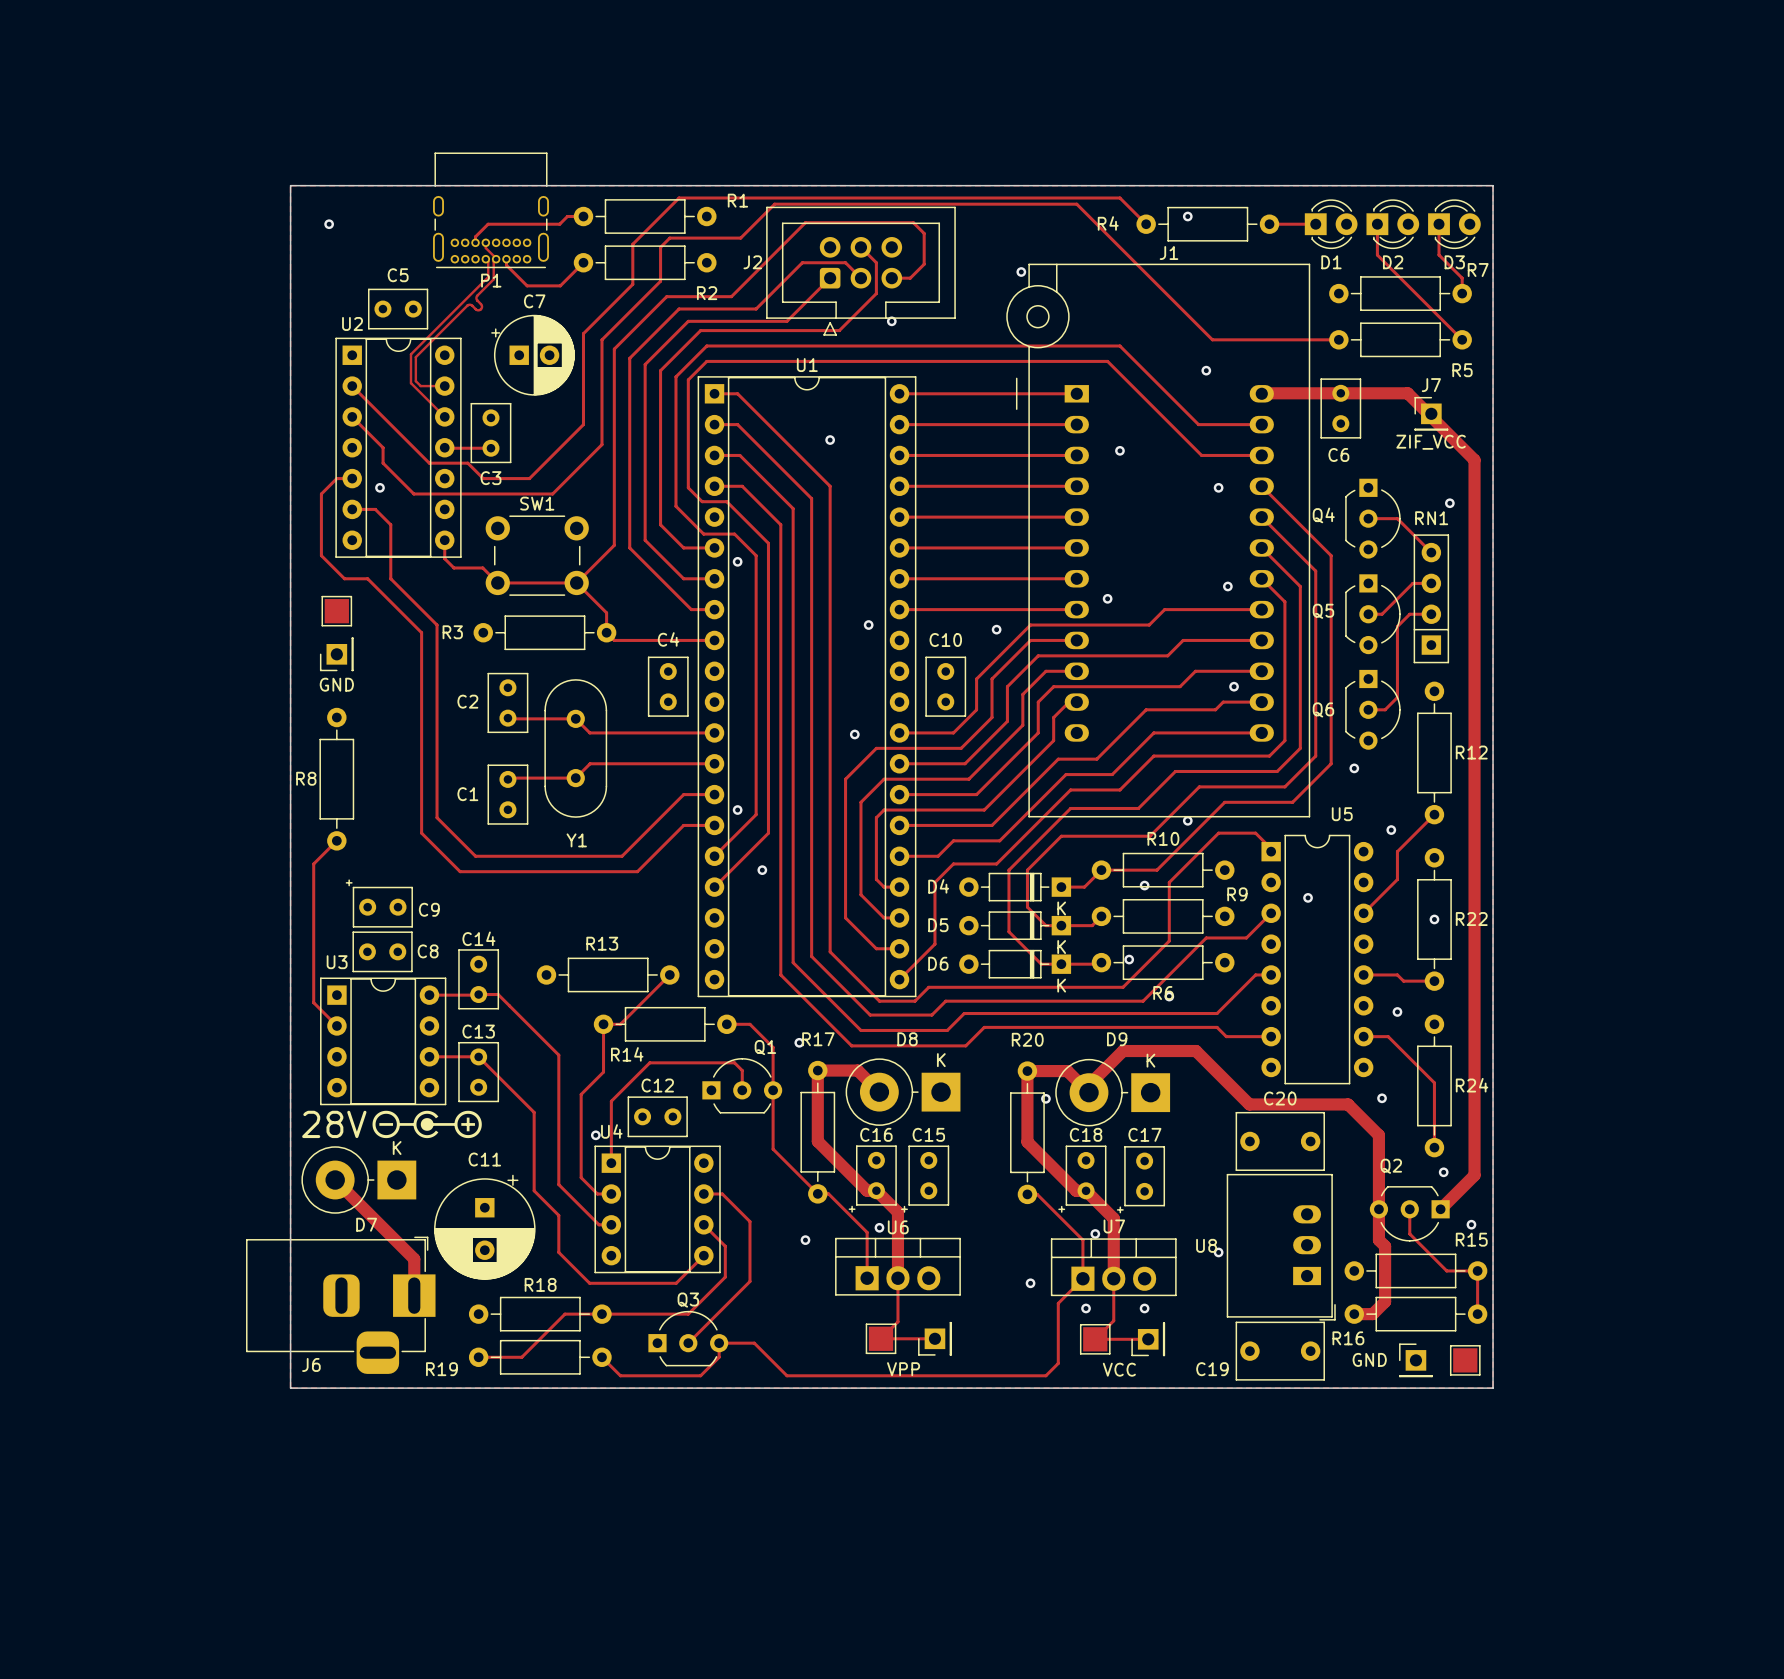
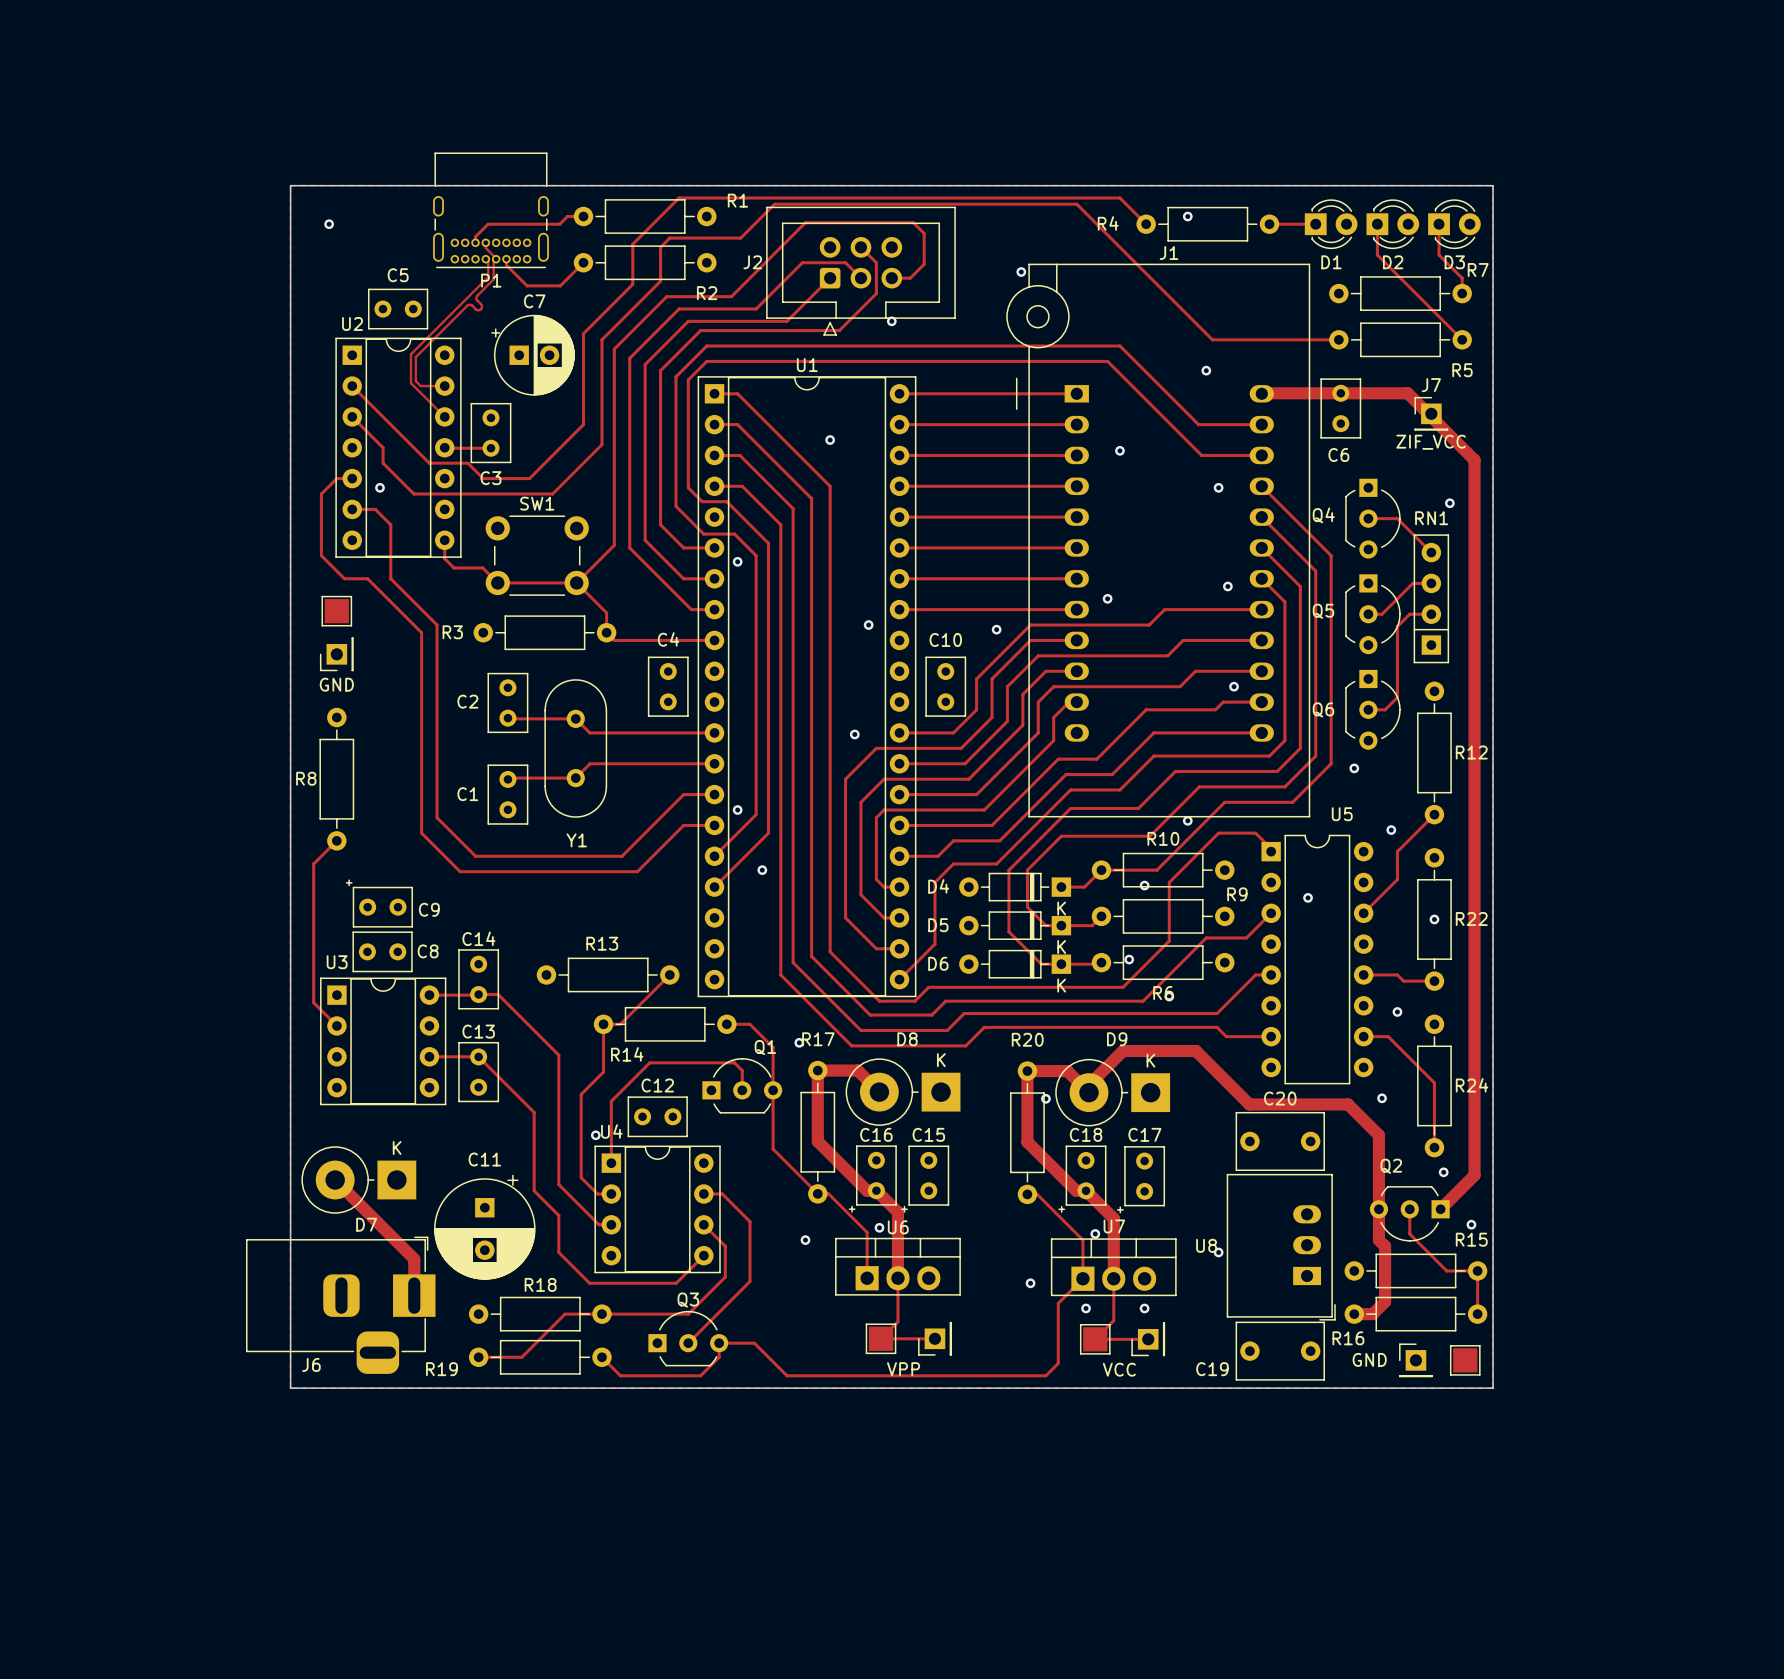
drawing: [372, 1110, 482, 1139] -> none
text: 28V (334, 1124) -> none

